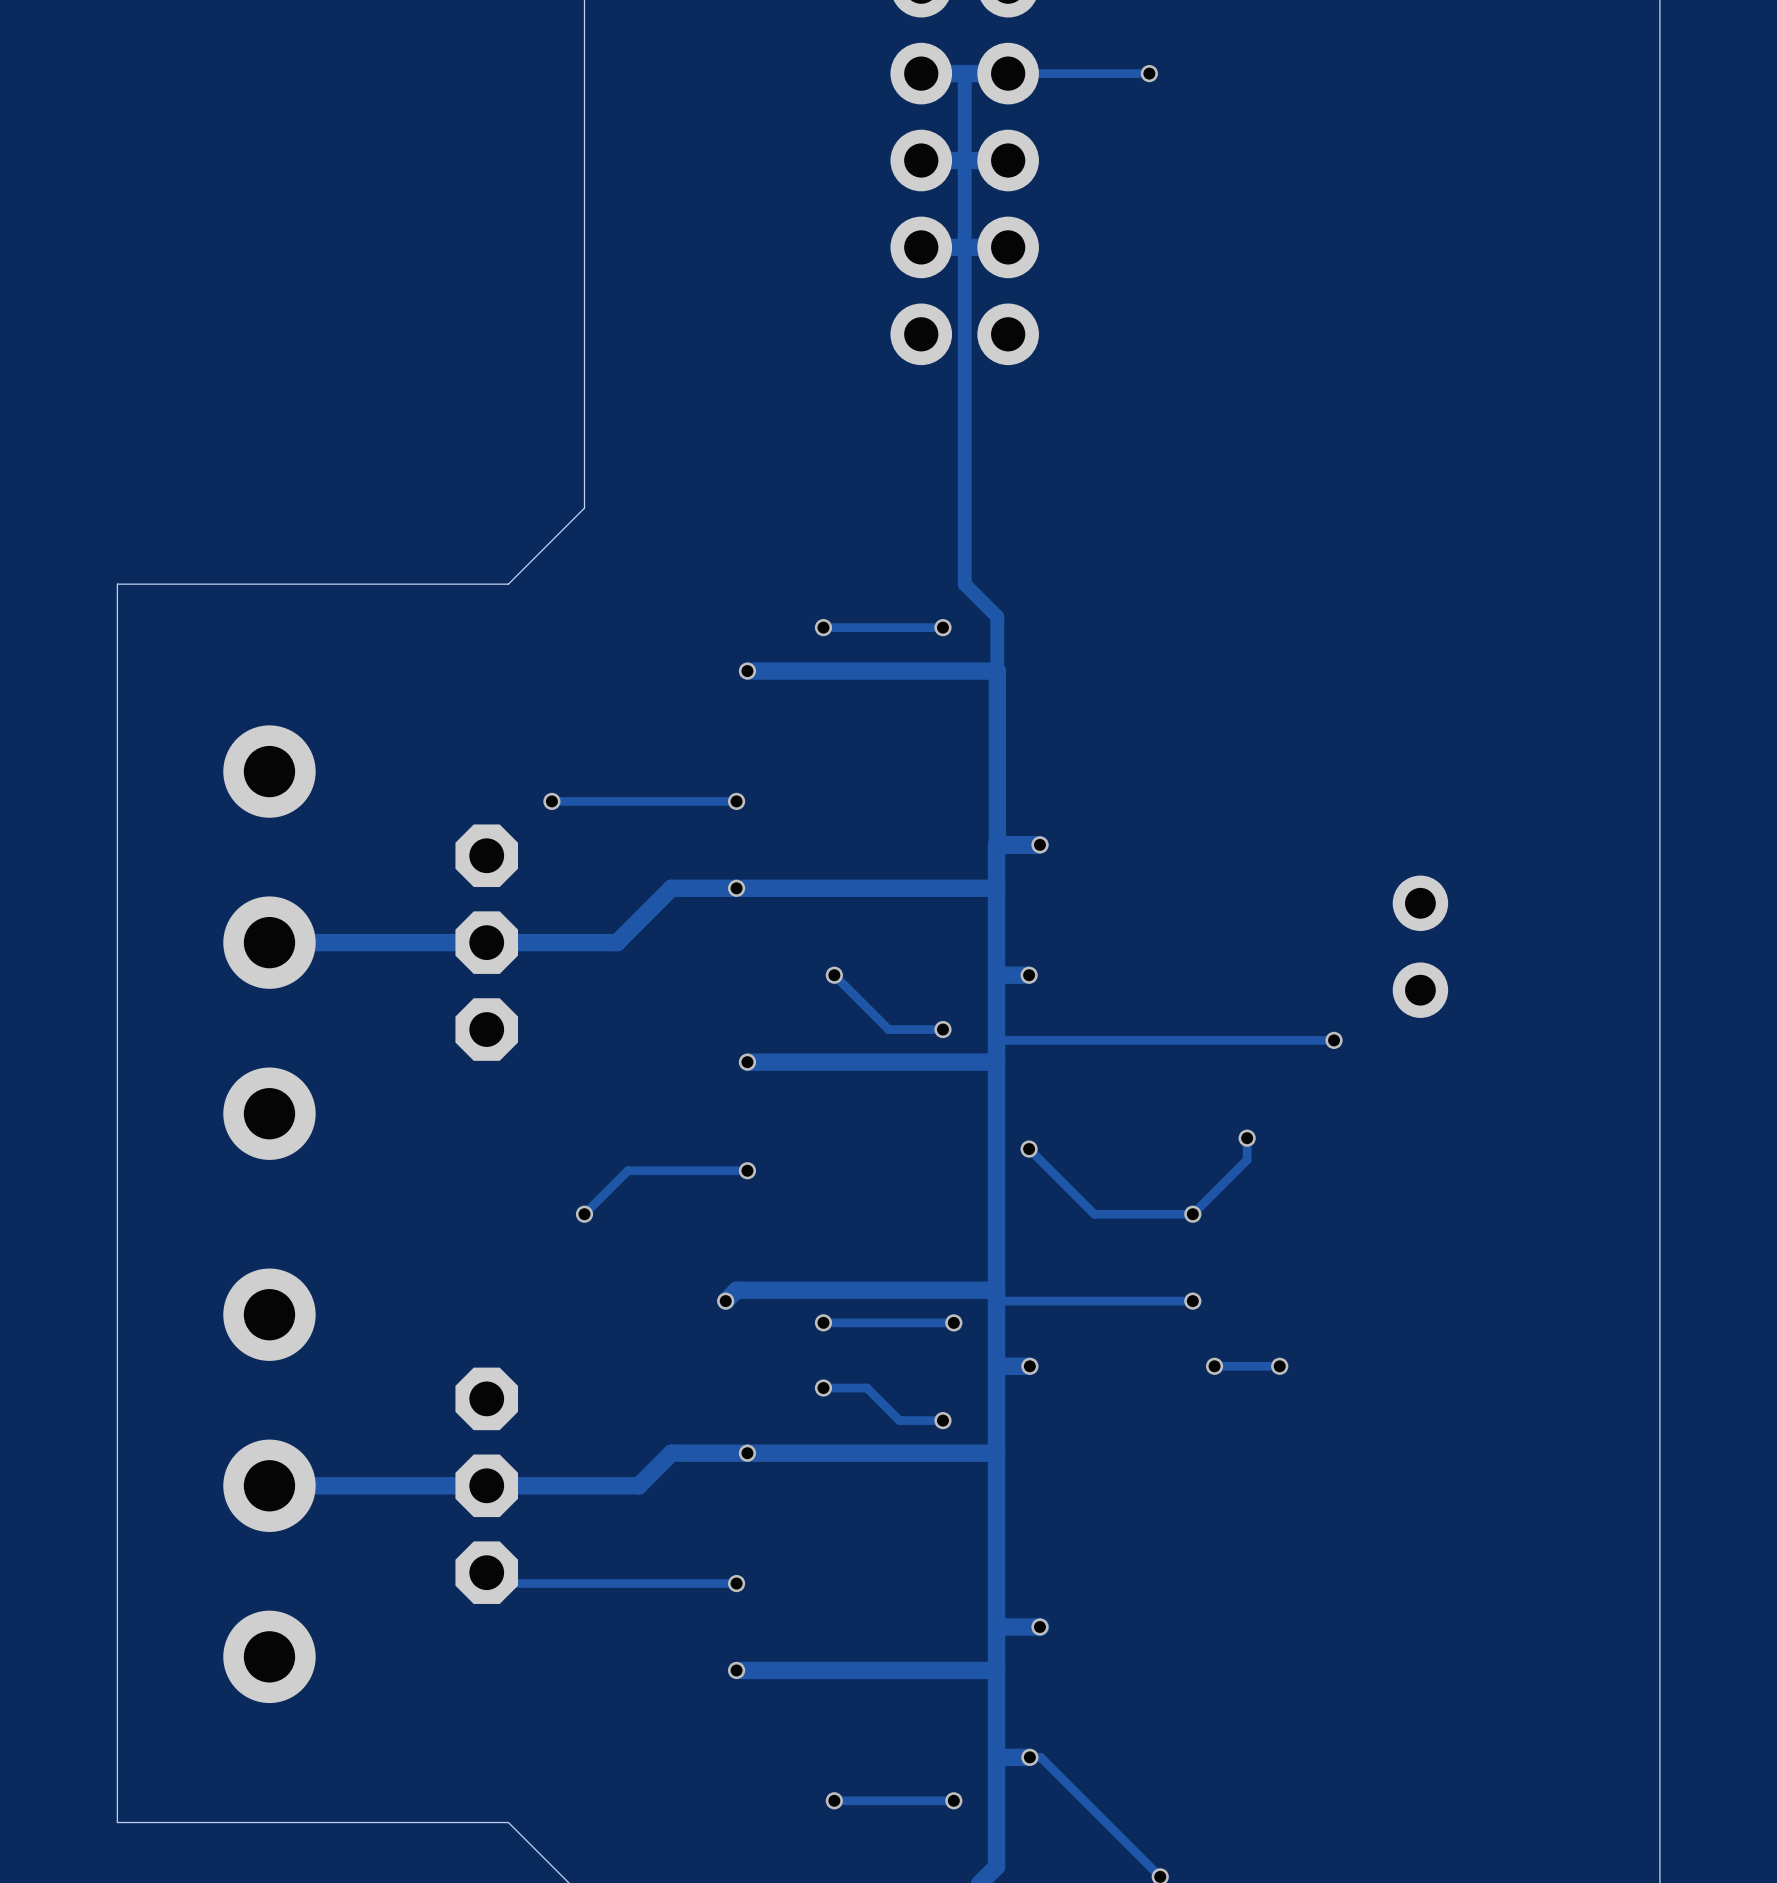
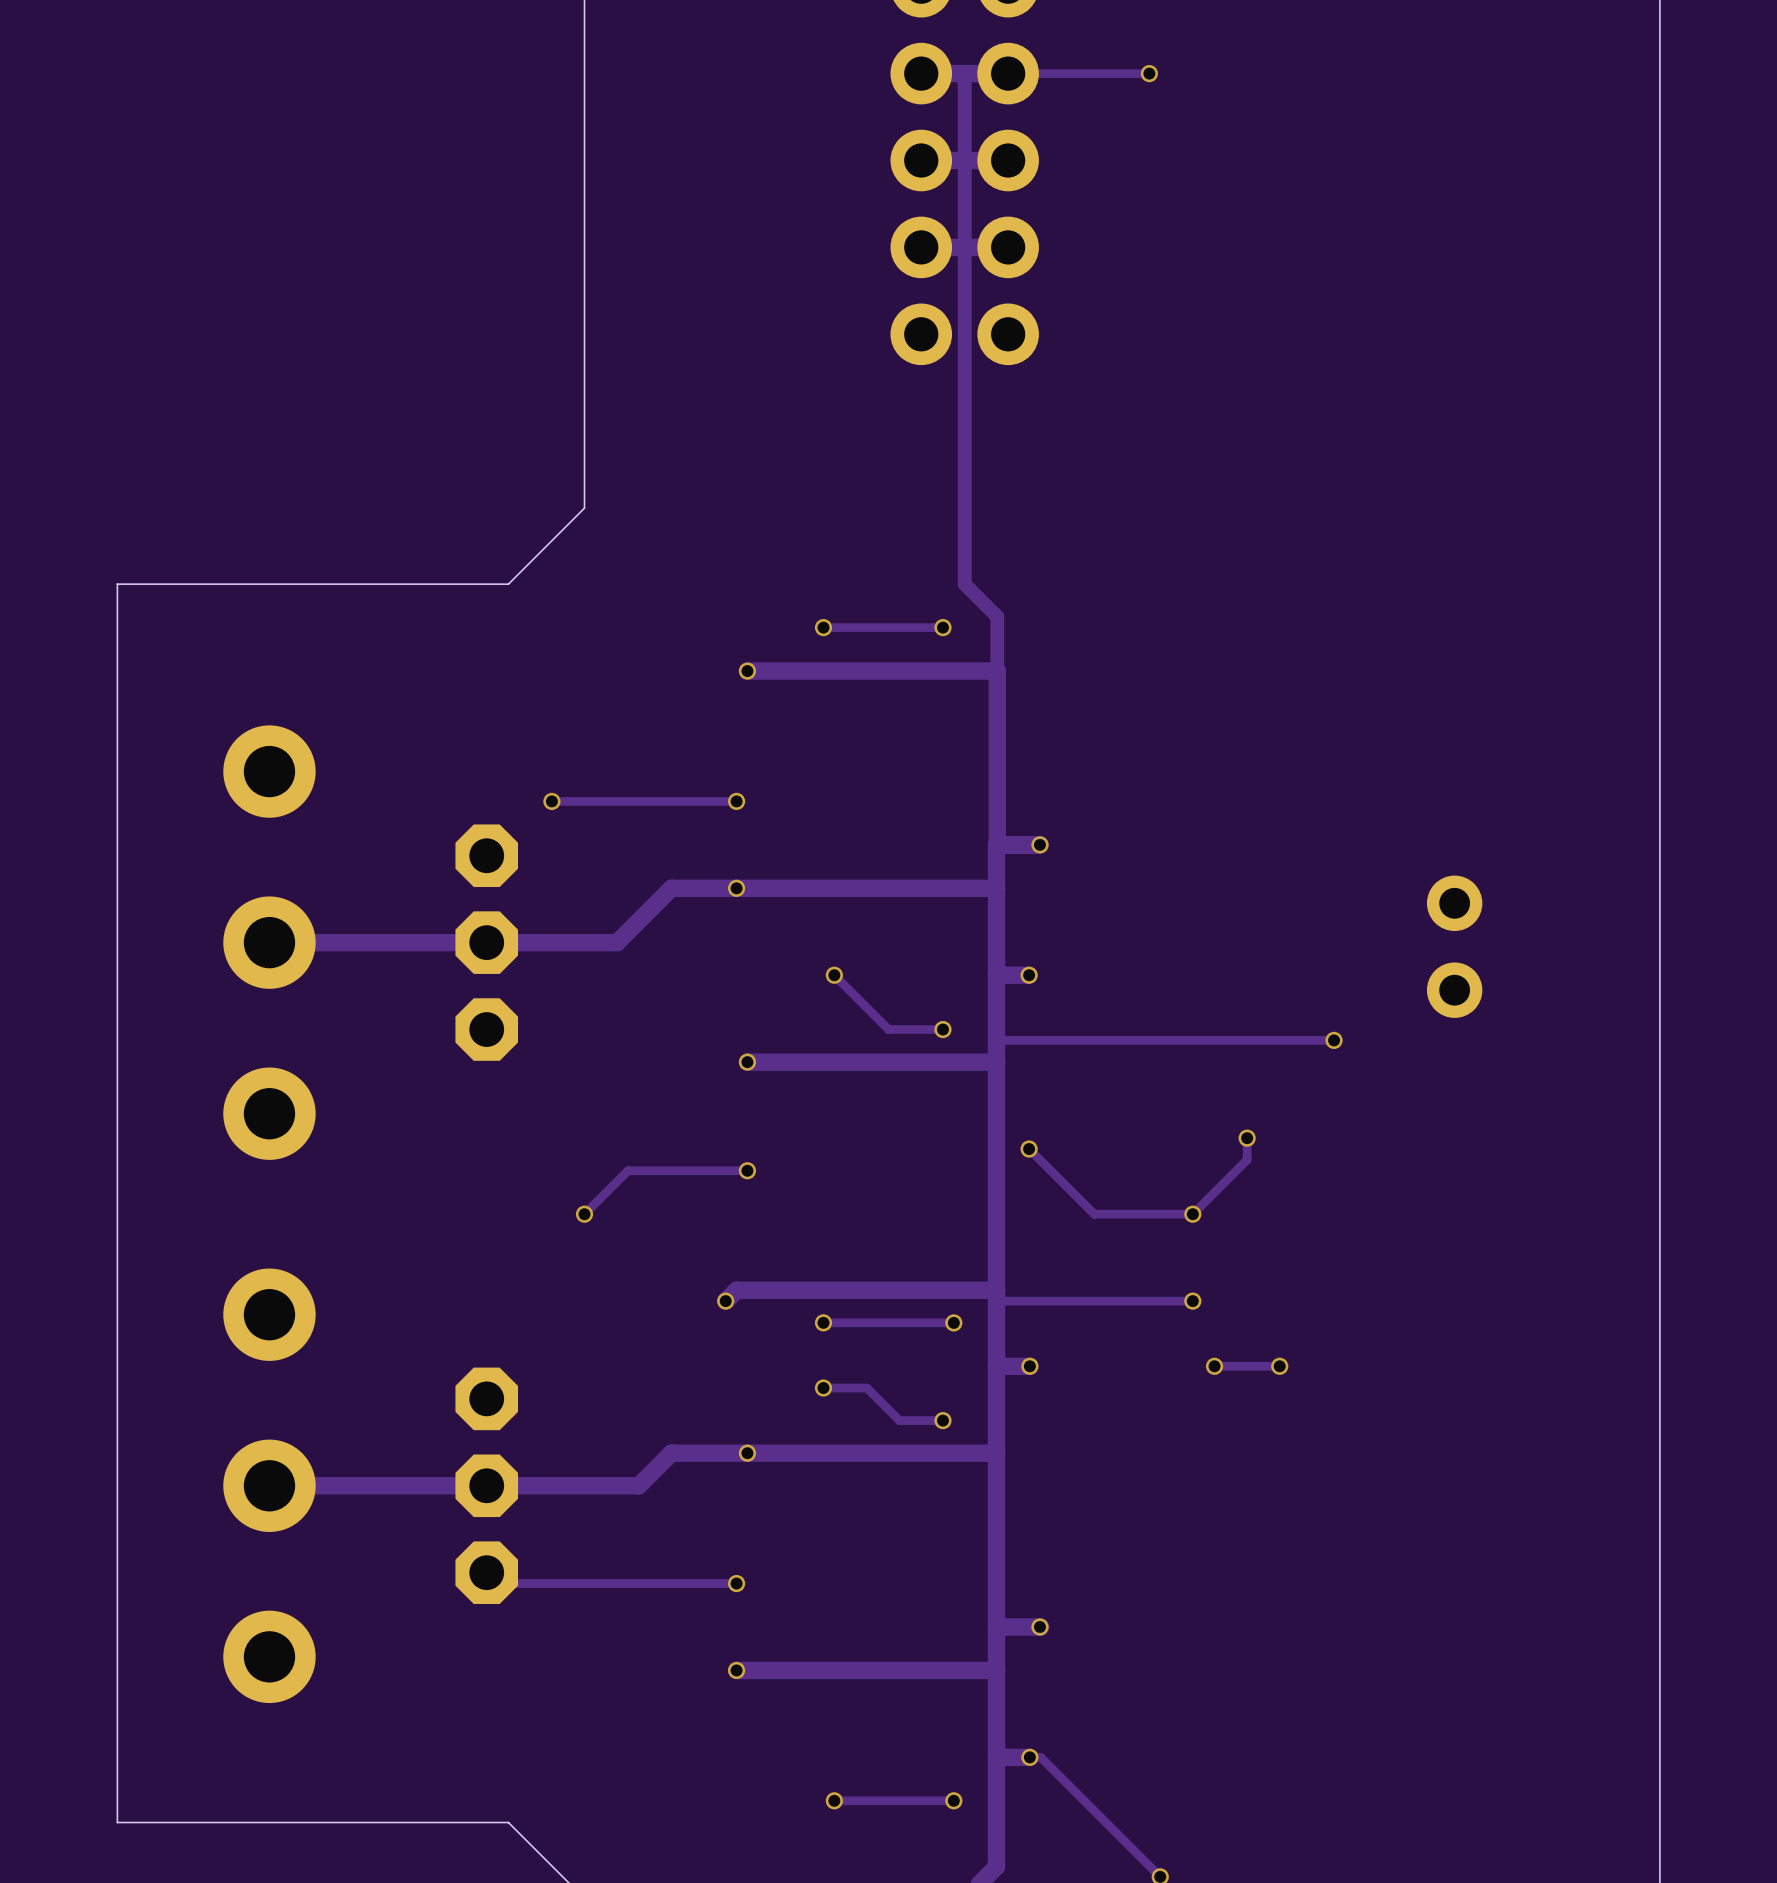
part position: (1420, 946) -> (1454, 946)

